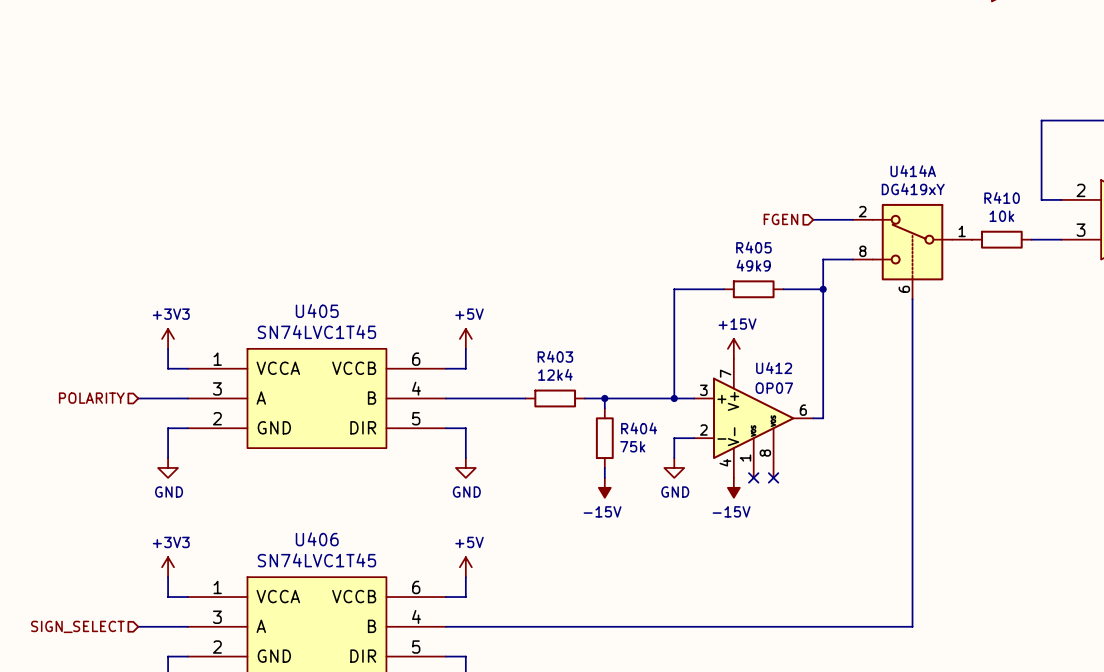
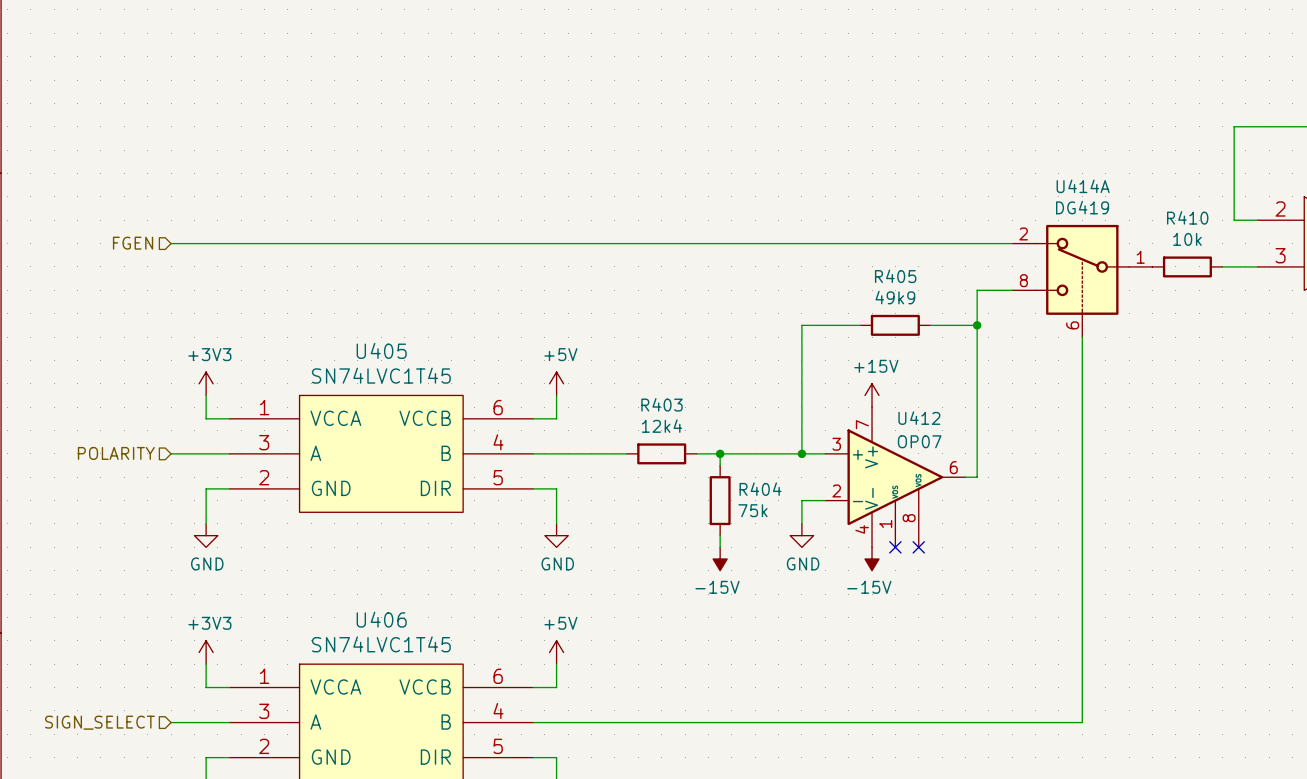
U414A value: DG419xY (913, 189) -> DG419 (1082, 207)
hierarchical label: none -> FGEN (133, 243)
wire: none -> (171, 243) (965, 243)
hierarchical label: FGEN (780, 219) -> none

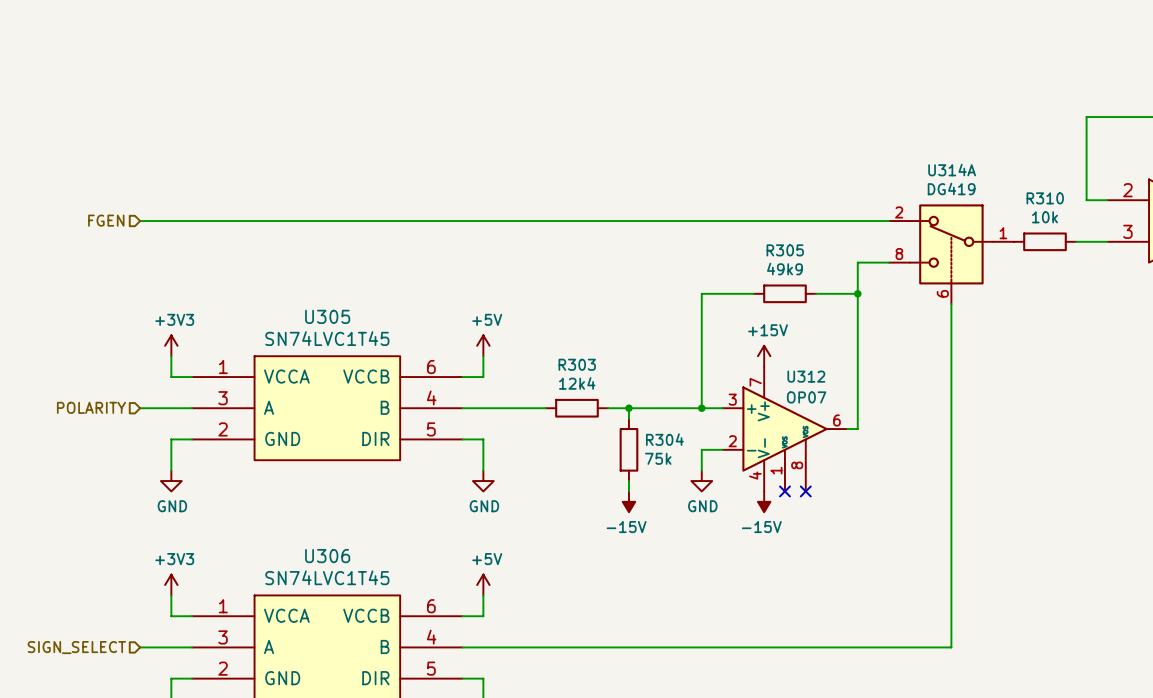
U414A name: U414A (1083, 186) -> U314A (952, 170)
R410 name: R410 (1187, 217) -> R310 (1045, 198)
R405 name: R405 (895, 276) -> R305 (785, 250)
U405 name: U405 (381, 350) -> U305 (327, 316)
R403 name: R403 (662, 404) -> R303 (577, 364)
U412 name: U412 (919, 418) -> U312 (806, 376)
R404 name: R404 (760, 489) -> R304 (664, 439)
U406 name: U406 (381, 619) -> U306 (327, 556)

